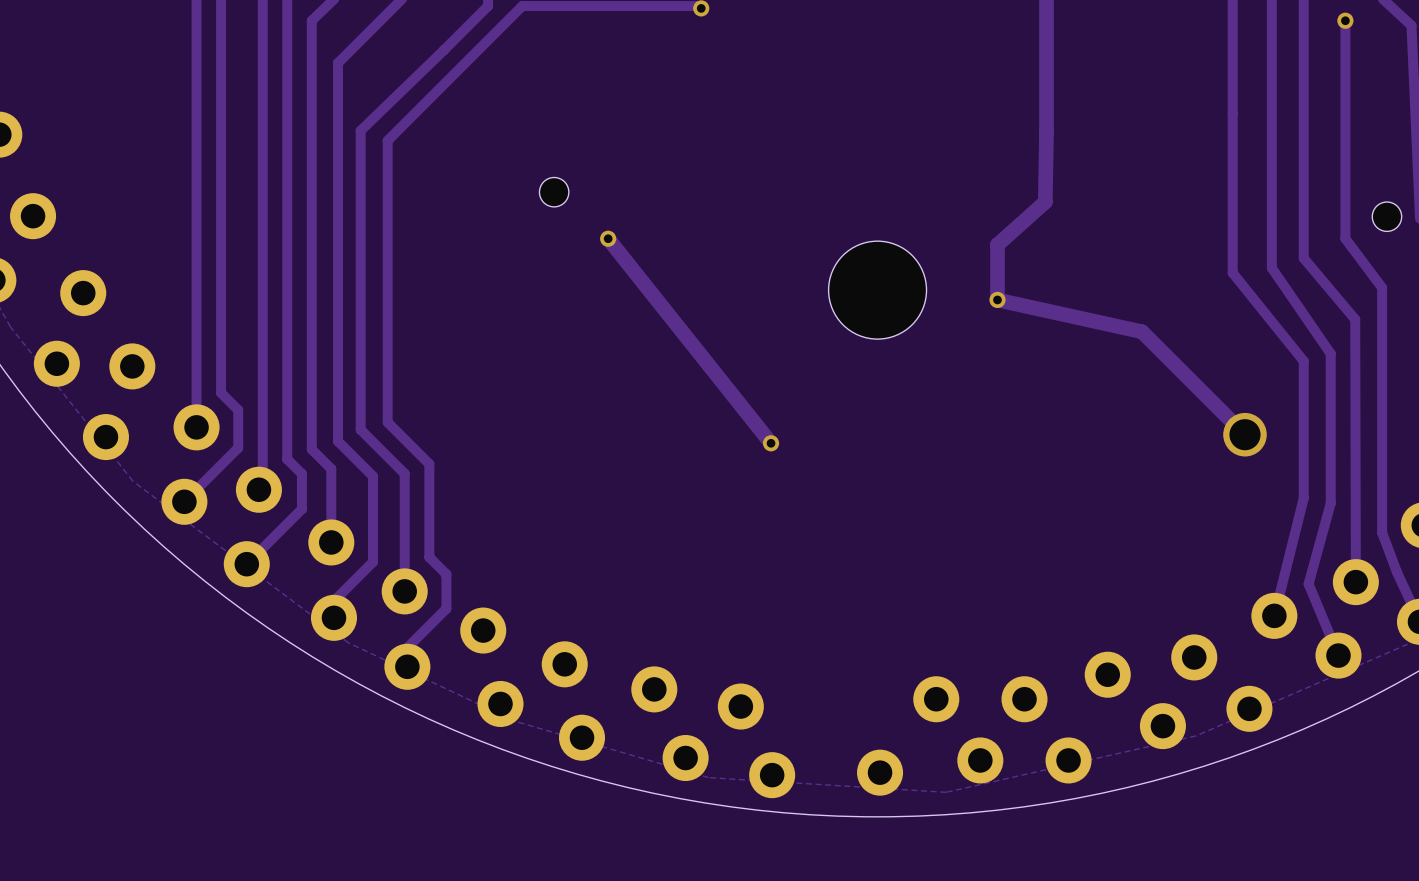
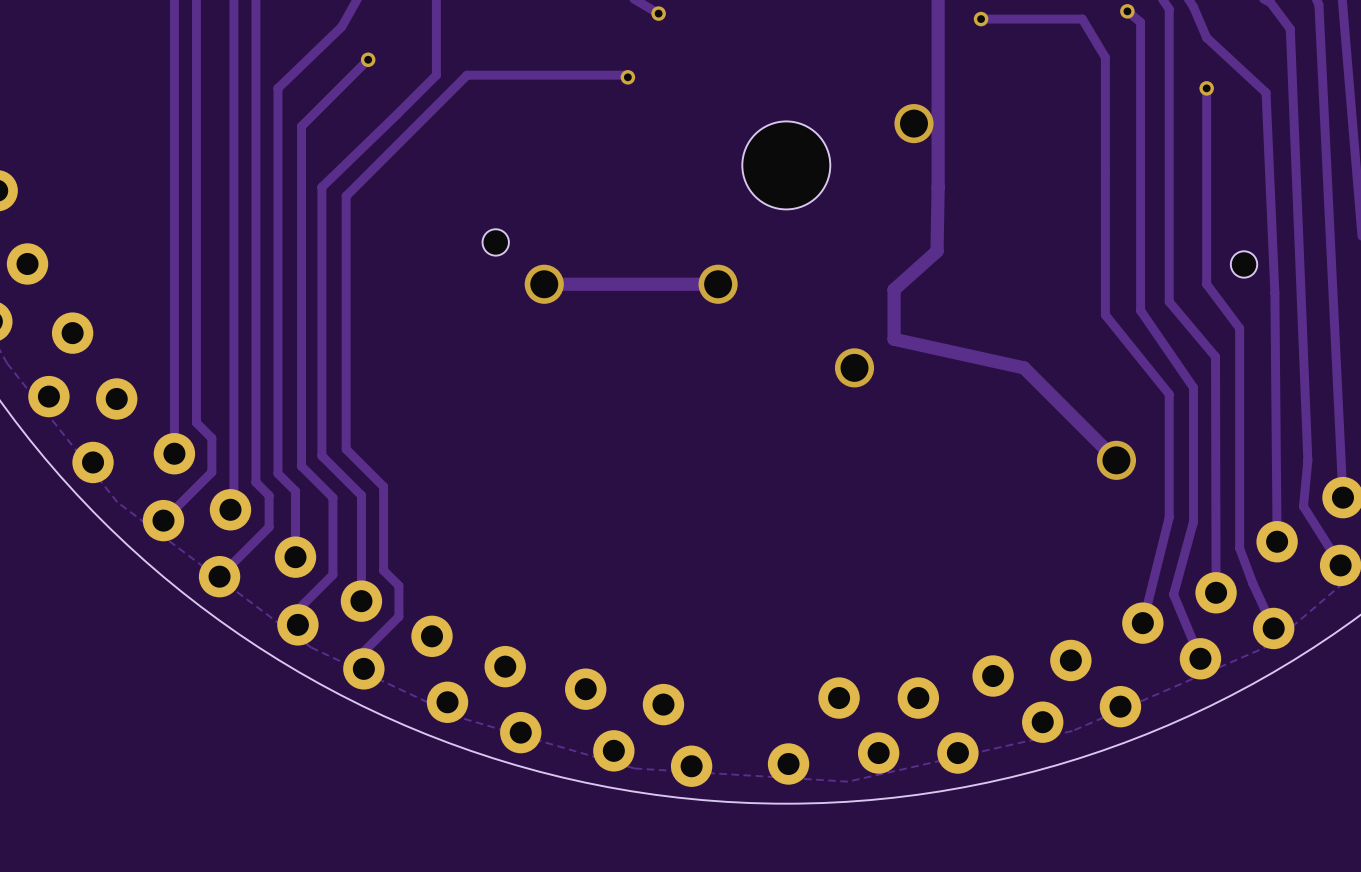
via: none -> (913, 123)
via size: [600, 230, 617, 247] -> [524, 264, 564, 304]
track: (608, 238) (771, 443) -> (544, 284) (718, 284)
via: none -> (718, 284)
part position: (877, 290) -> (786, 165)
via: (997, 299) -> none
via: none -> (854, 367)
via: (771, 443) -> none

